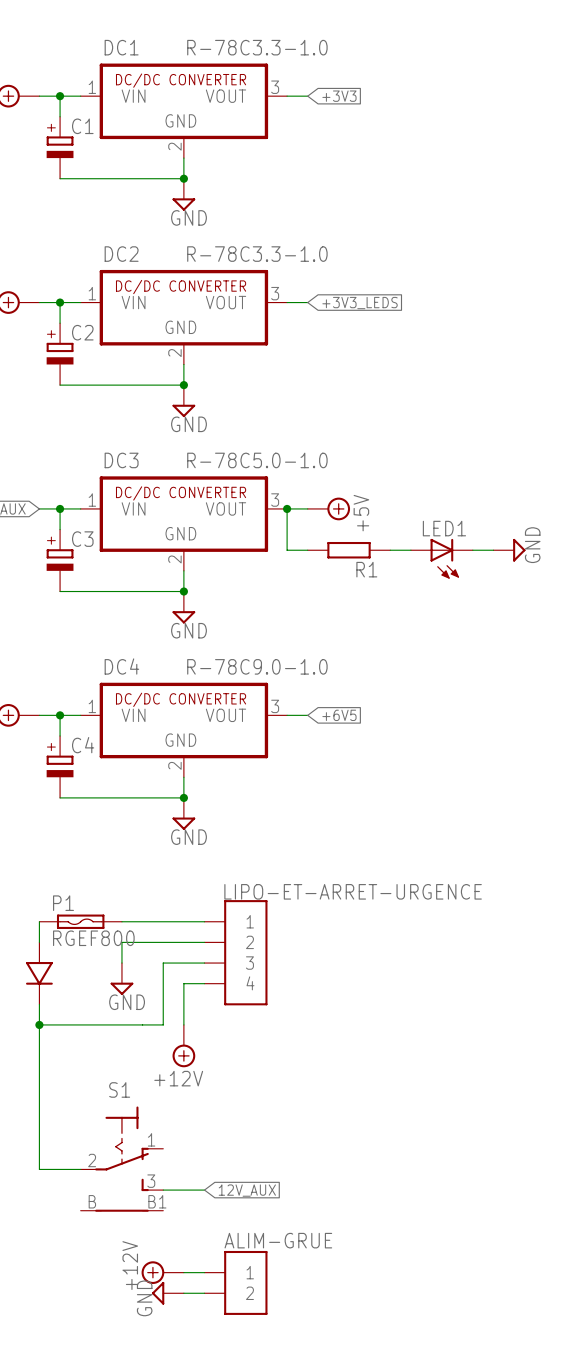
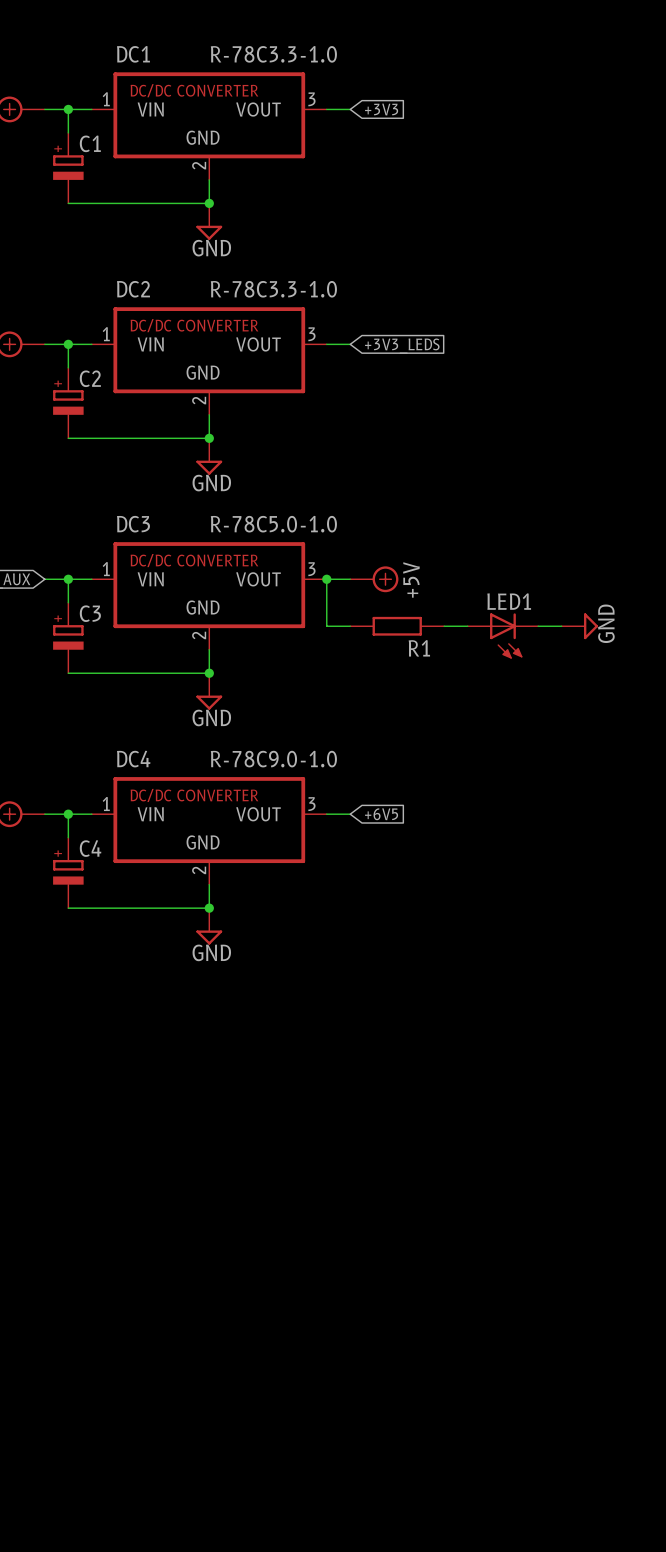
wire: (39, 921) (39, 942) -> none
P1: RGEF800 (80, 921) -> none
wire: (121, 921) (204, 921) -> none
wire: (204, 942) (121, 942) (121, 963) -> none
LIPO-ET-ARRET-URGENCE: (236, 952) -> none
wire: (204, 963) (163, 963) (163, 1024) (39, 1024) -> none
part: (39, 973) -> none
power symbol: GND (121, 979) -> none
wire: (204, 983) (183, 983) (183, 1024) -> none
wire: (39, 1004) (39, 1169) (80, 1169) -> none
junction: (39, 1024) -> none
power symbol: +12V (183, 1046) -> none
S1: (121, 1159) -> none
wire: (163, 1190) (204, 1190) -> none
global label: 12V_AUX (247, 1190) -> none
power symbol: +12V (162, 1272) -> none
wire: (183, 1272) (204, 1272) -> none
ALIM-GRUE: (236, 1282) -> none
power symbol: GND (167, 1293) -> none
wire: (183, 1293) (204, 1293) -> none

